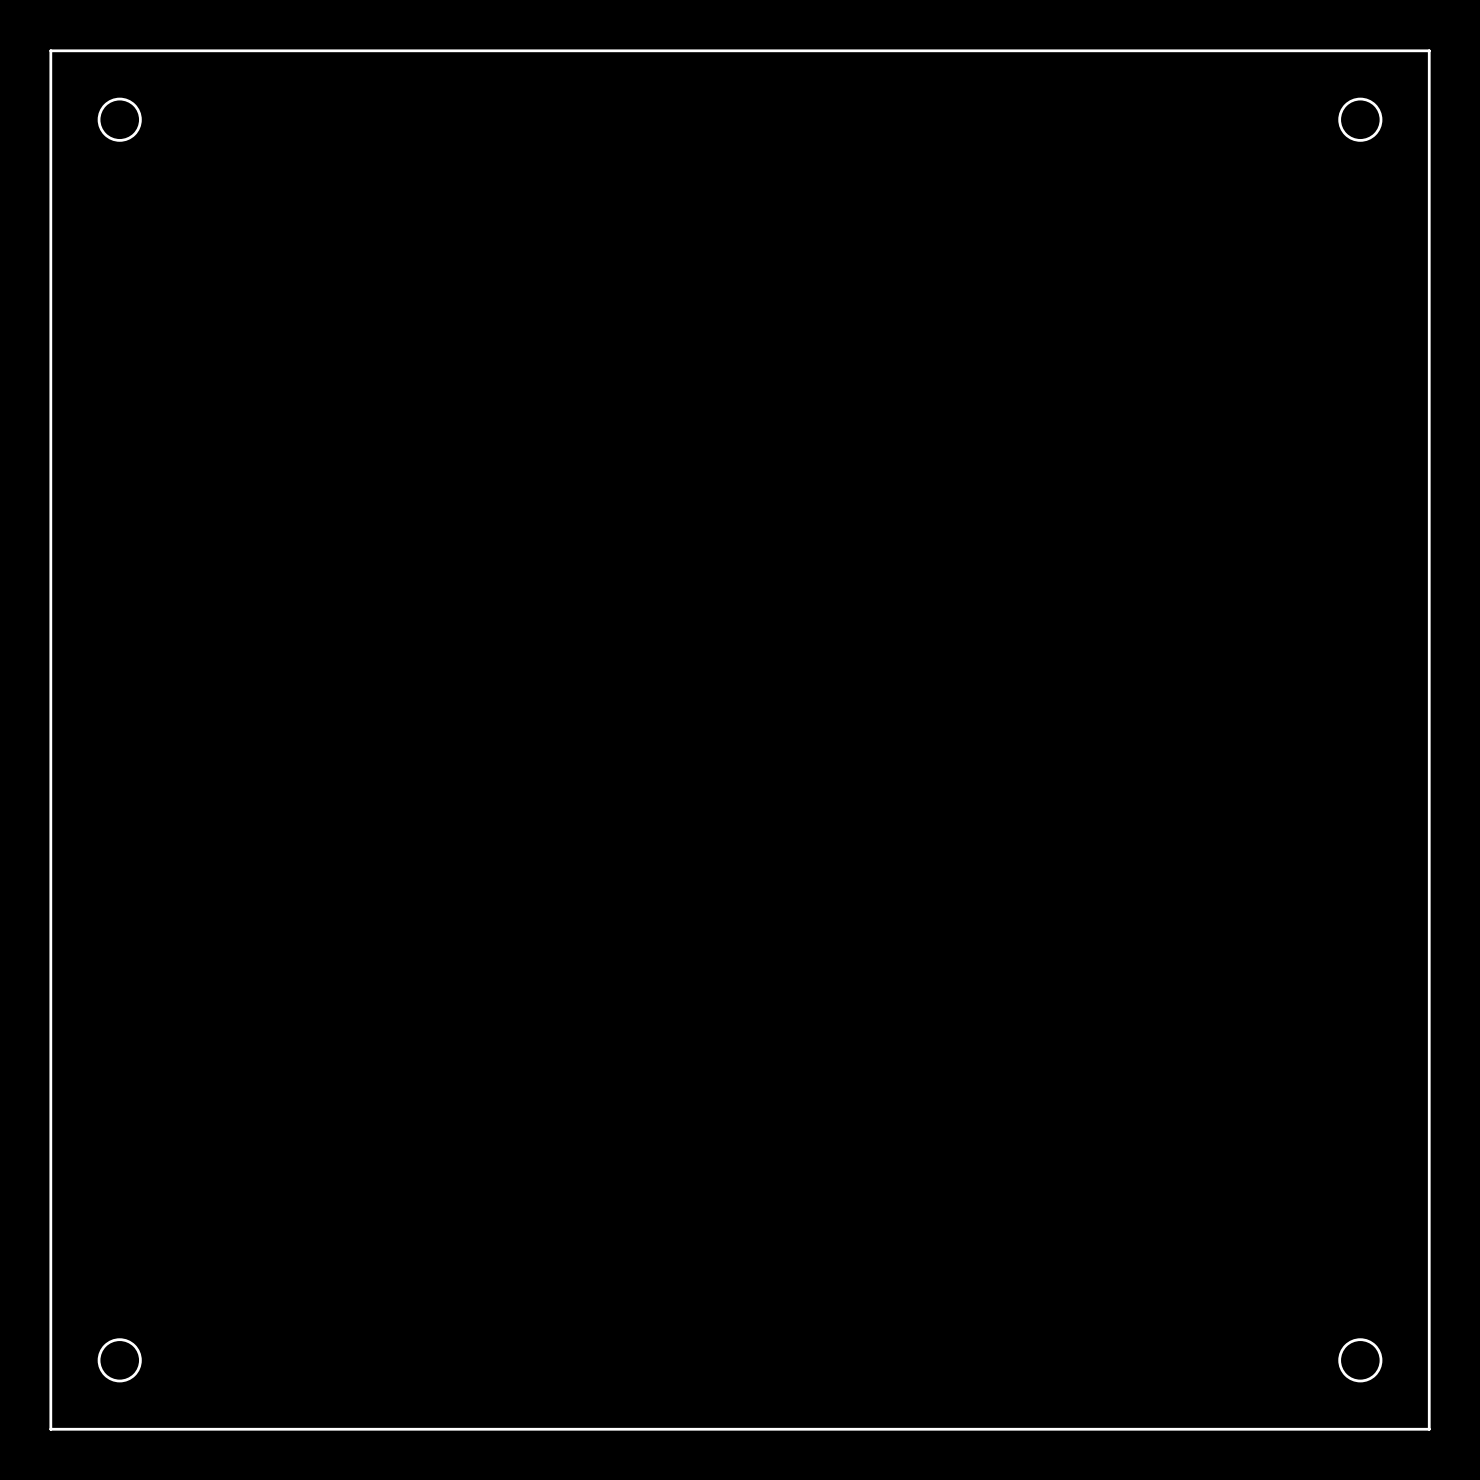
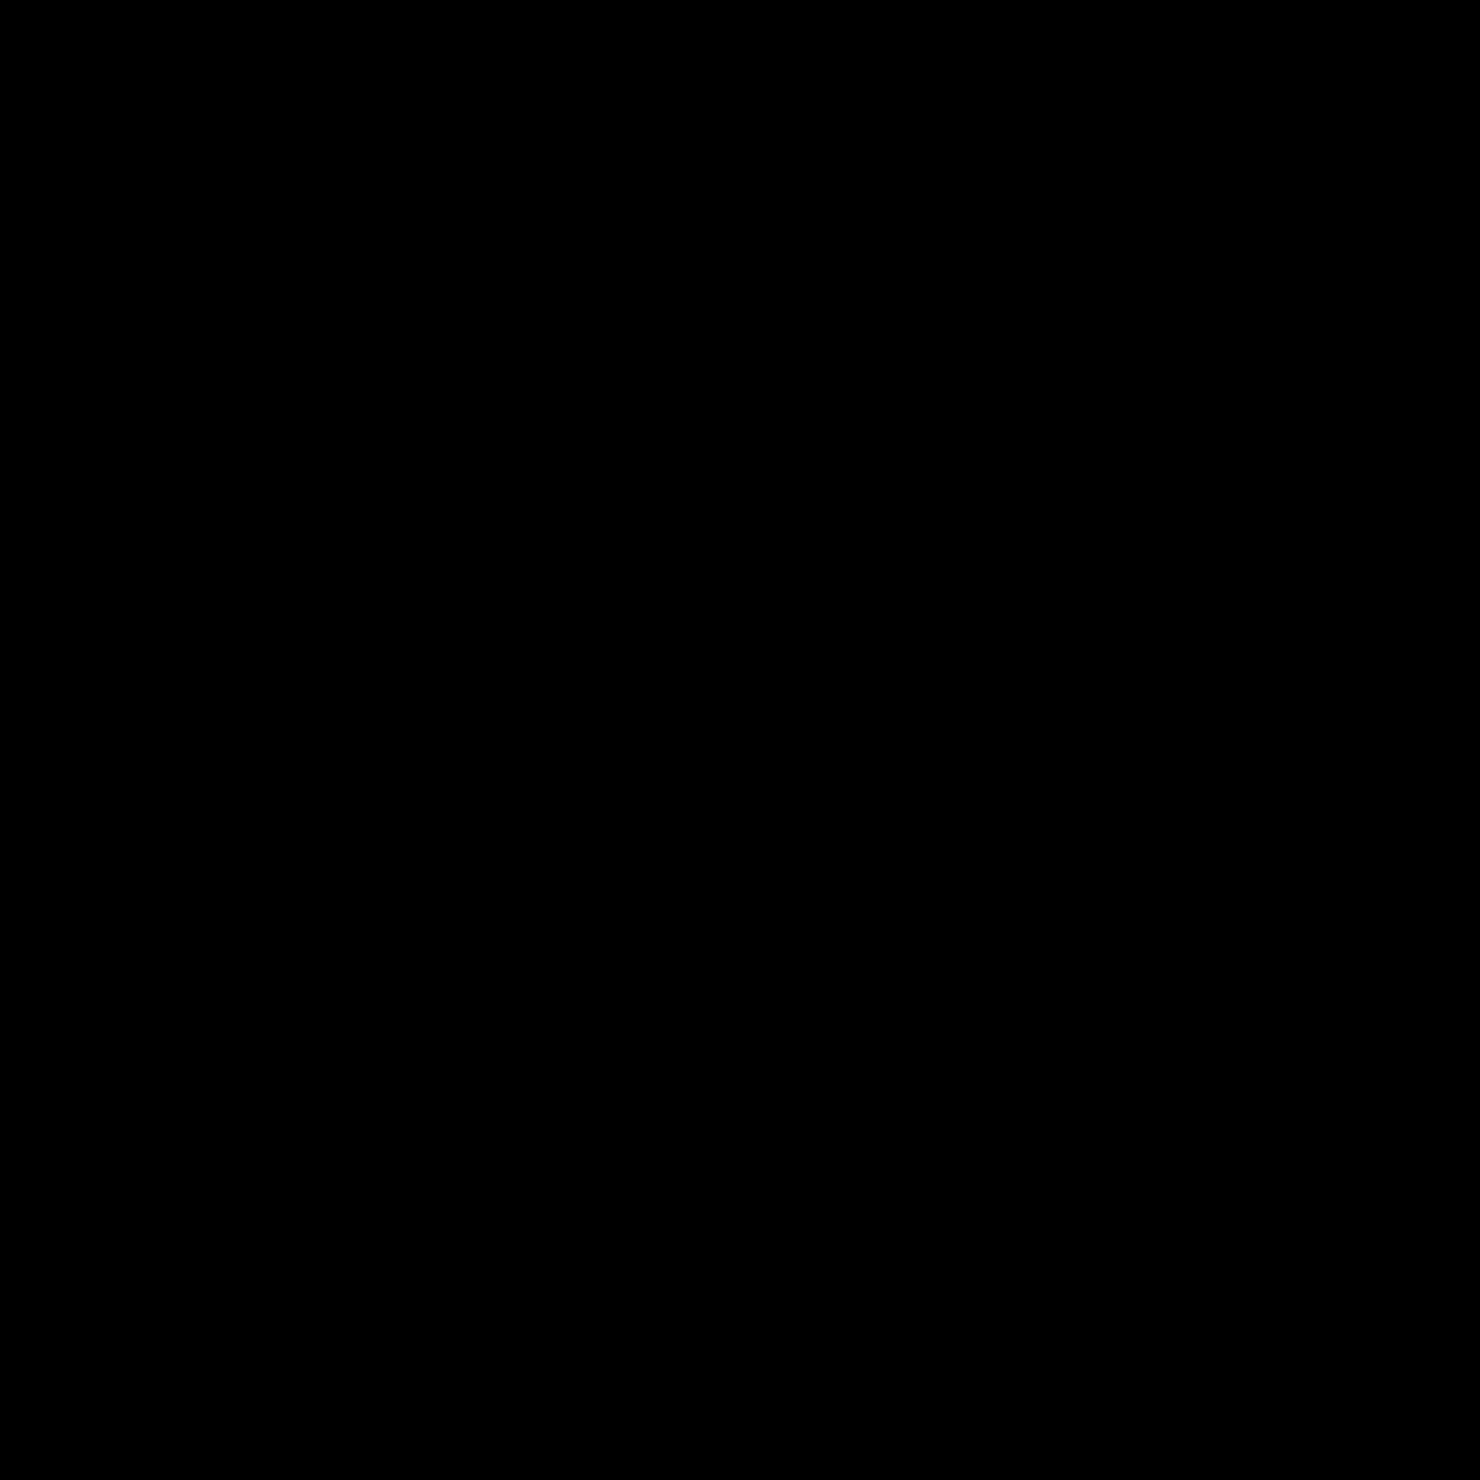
board edge: (1429, 50) (50, 50) (50, 1429) (1429, 1429) (1429, 50) -> none
round board edge: [97, 97, 142, 142] -> none
round board edge: [1338, 97, 1383, 142] -> none
round board edge: [97, 1338, 142, 1383] -> none
round board edge: [1338, 1338, 1383, 1383] -> none

